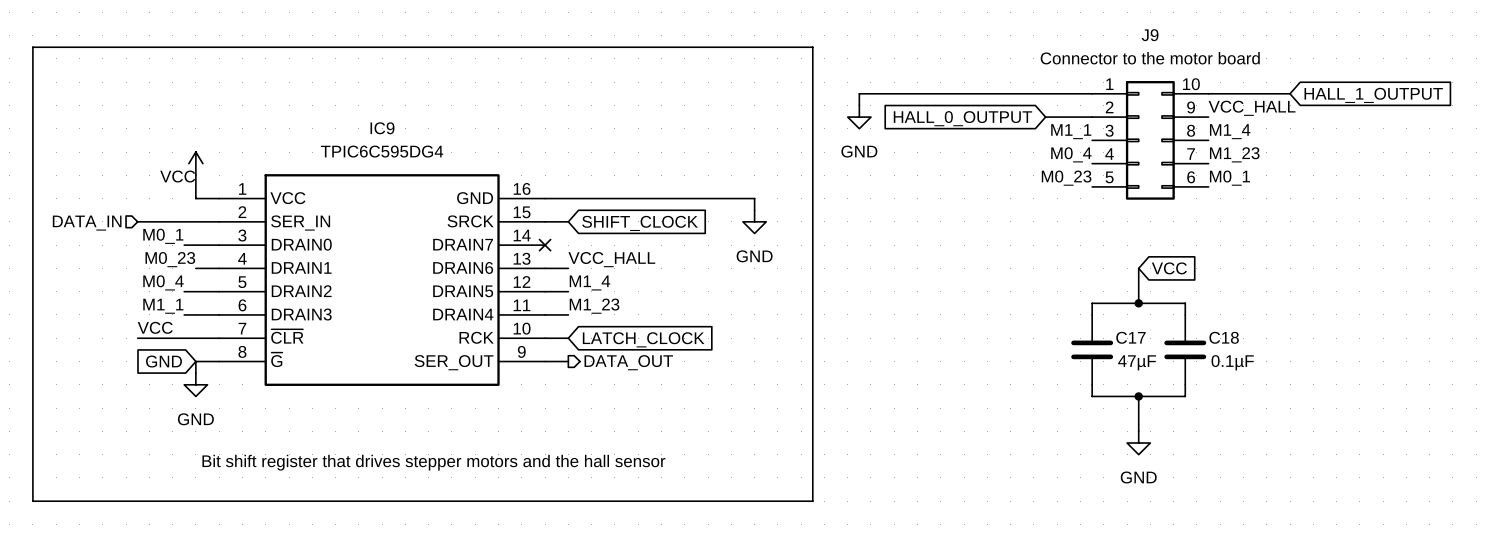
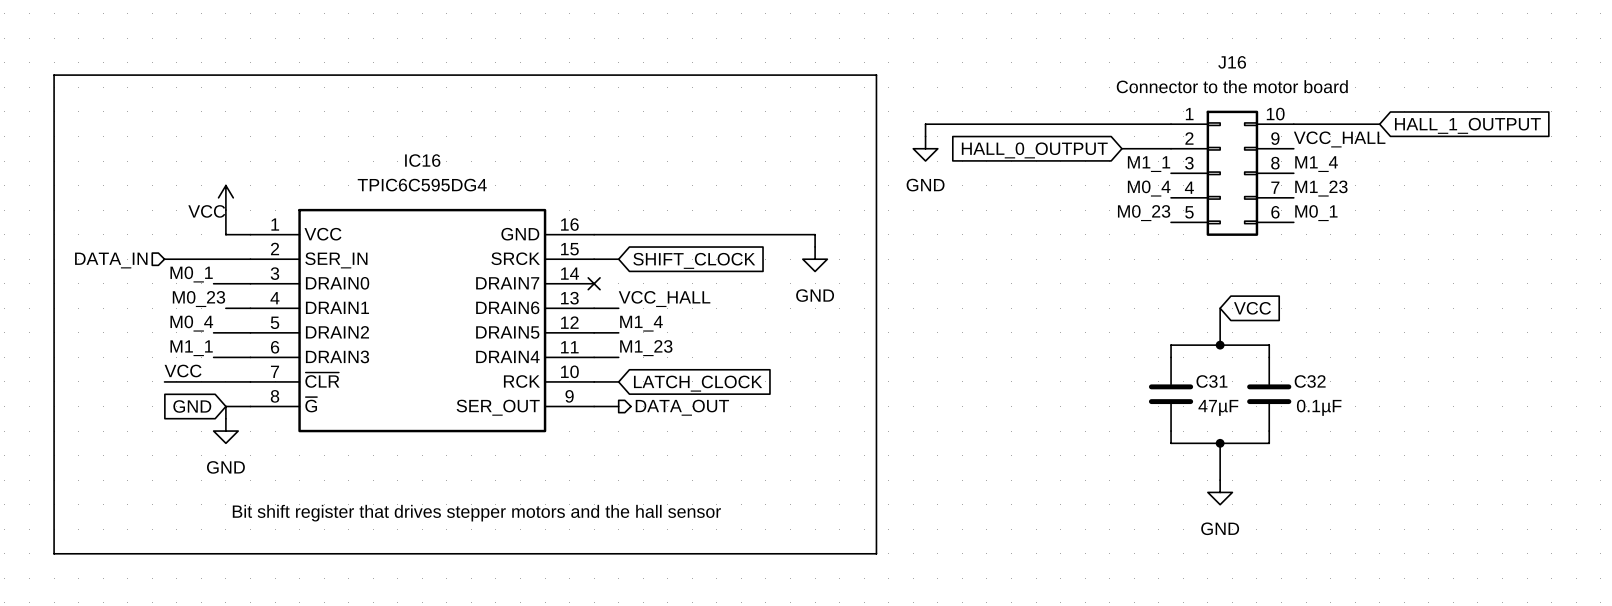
J9 name: J9 (1150, 35) -> J16 (1232, 62)
IC9 name: IC9 (382, 128) -> IC16 (422, 160)
C17 name: C17 (1130, 337) -> C31 (1211, 381)
C18 name: C18 (1224, 337) -> C32 (1310, 381)

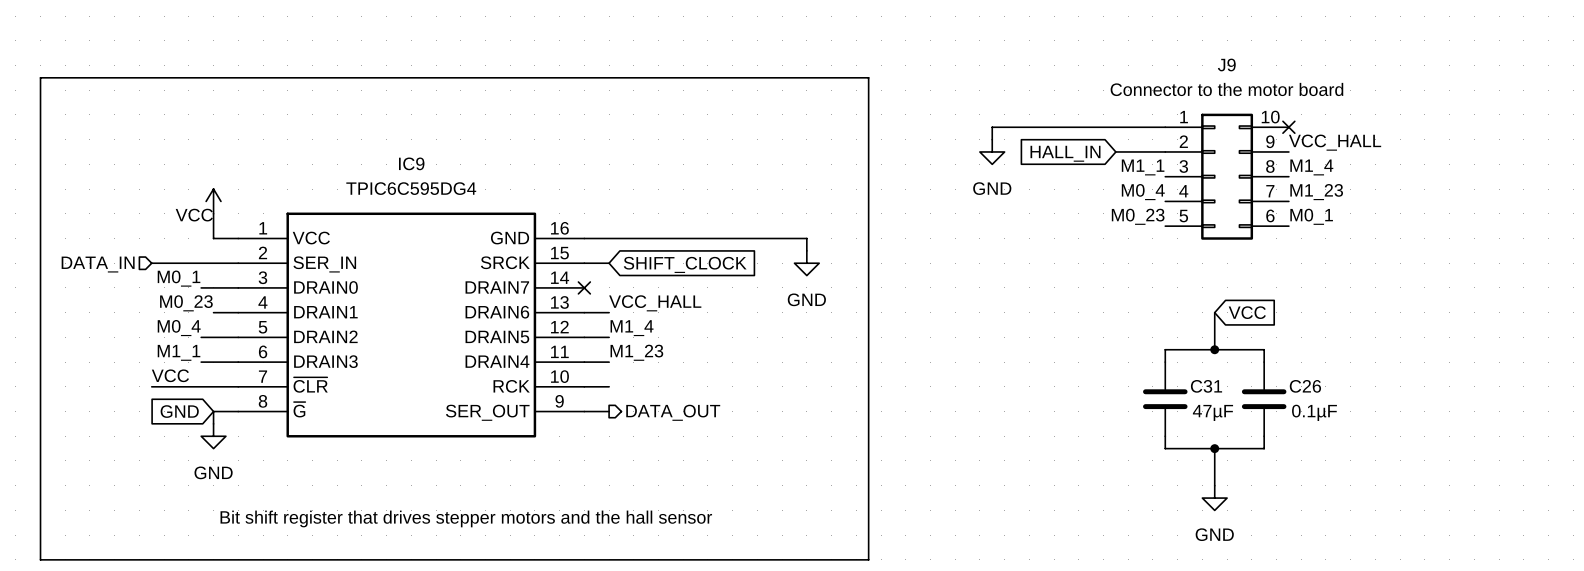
J16 name: J16 (1232, 62) -> J9 (1226, 64)
wire: (999, 124) (925, 124) (925, 136) -> (992, 127) (992, 139)
wire: (1293, 124) (1379, 124) -> none
no-connect mark: none -> (1288, 127)
global label: HALL_1_OUTPUT (1467, 125) -> none
power symbol position: GND (925, 148) -> GND (992, 151)
global label: HALL_0_OUTPUT (1034, 150) -> HALL_IN (1065, 153)
IC16 name: IC16 (422, 160) -> IC9 (411, 163)
C32 name: C32 (1310, 381) -> C26 (1305, 386)
global label: LATCH_CLOCK (698, 383) -> none

